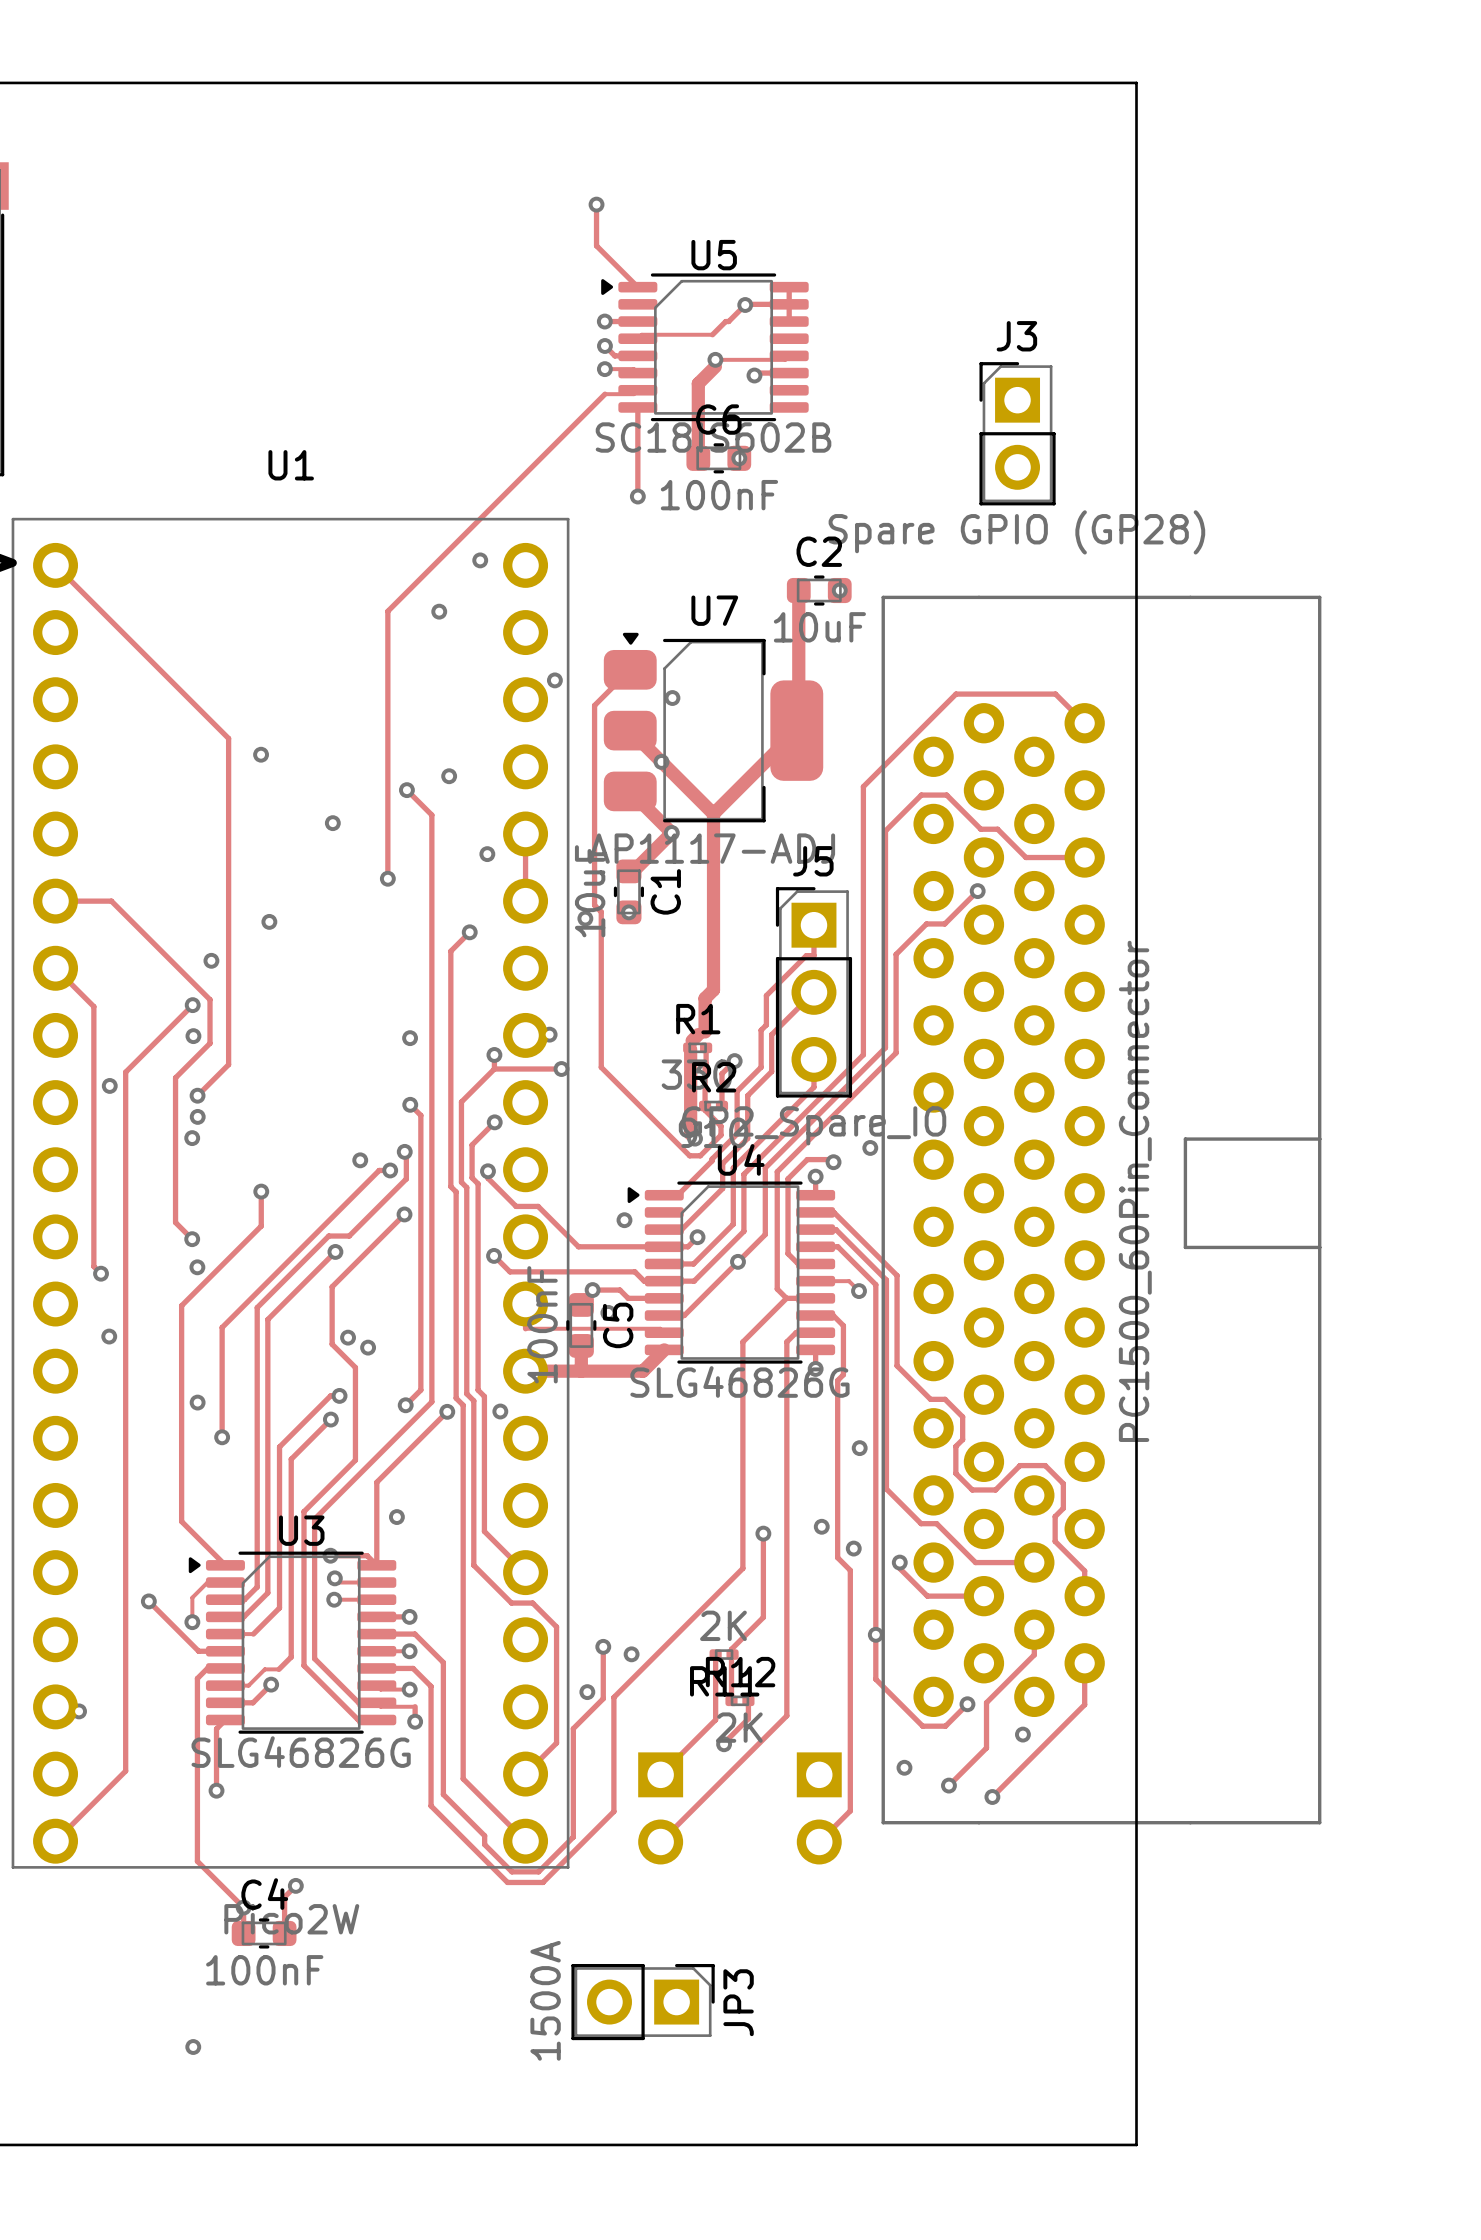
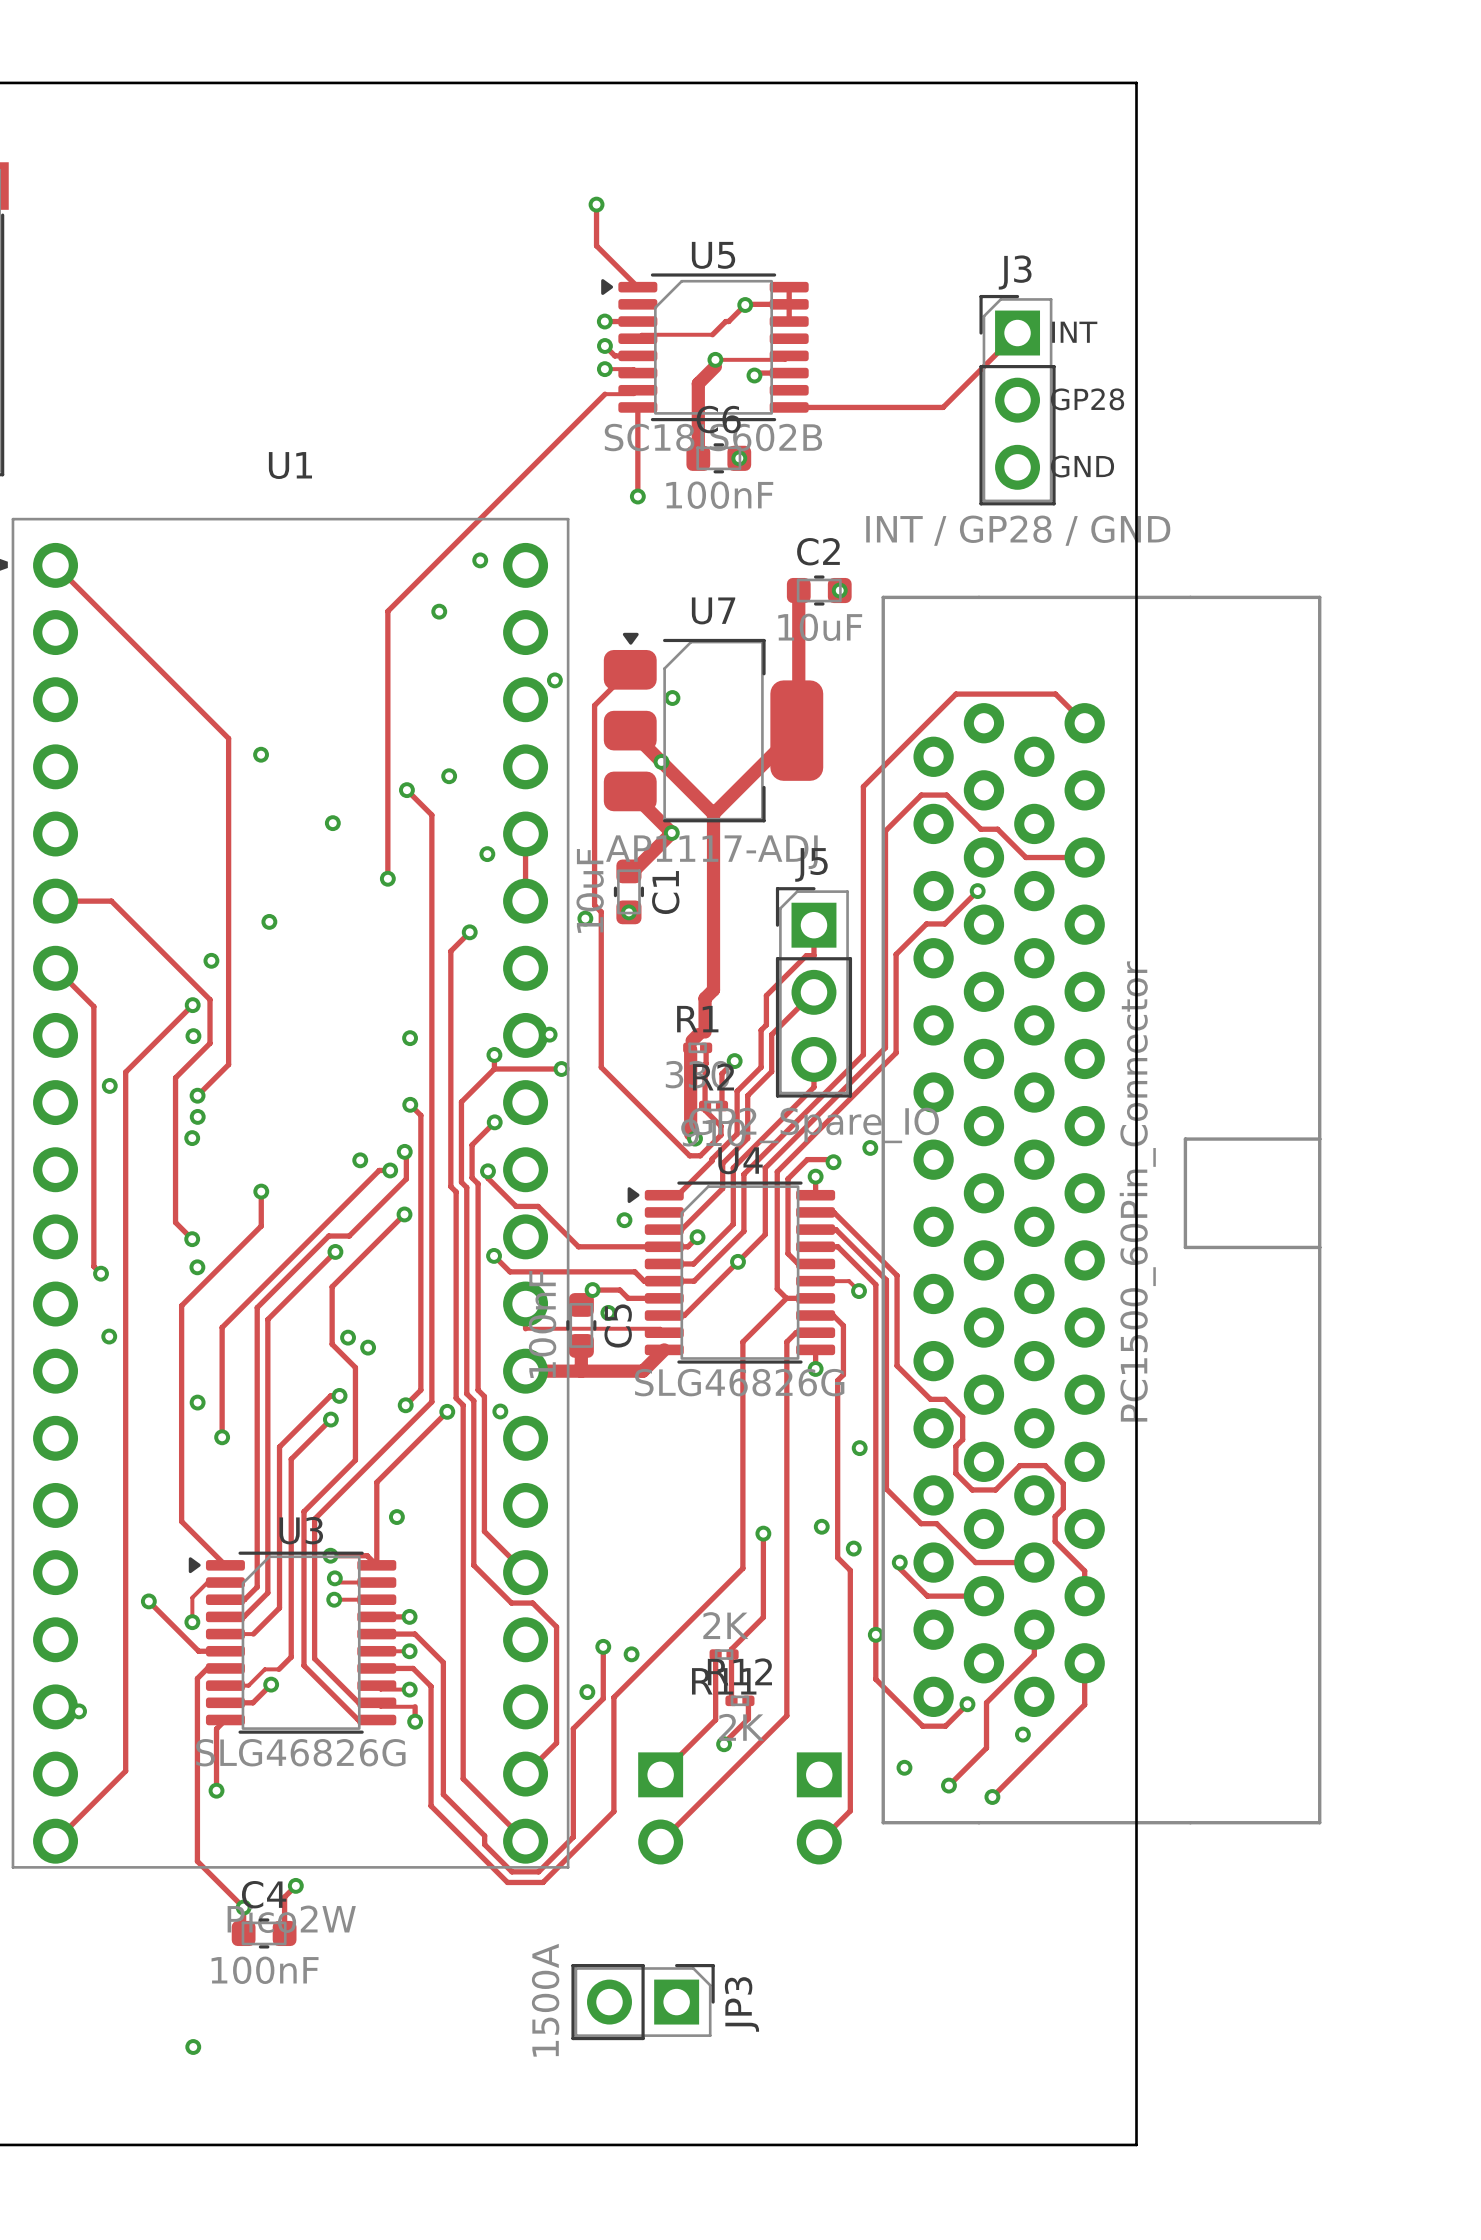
track: none -> (1017, 333) (943, 407) (789, 407)
J3 footprint: [979, 362, 1056, 506] -> [979, 294, 1056, 506]
J3 value: Spare GPIO (GP28) (1016, 532) -> INT / GP28 / GND (1018, 530)

